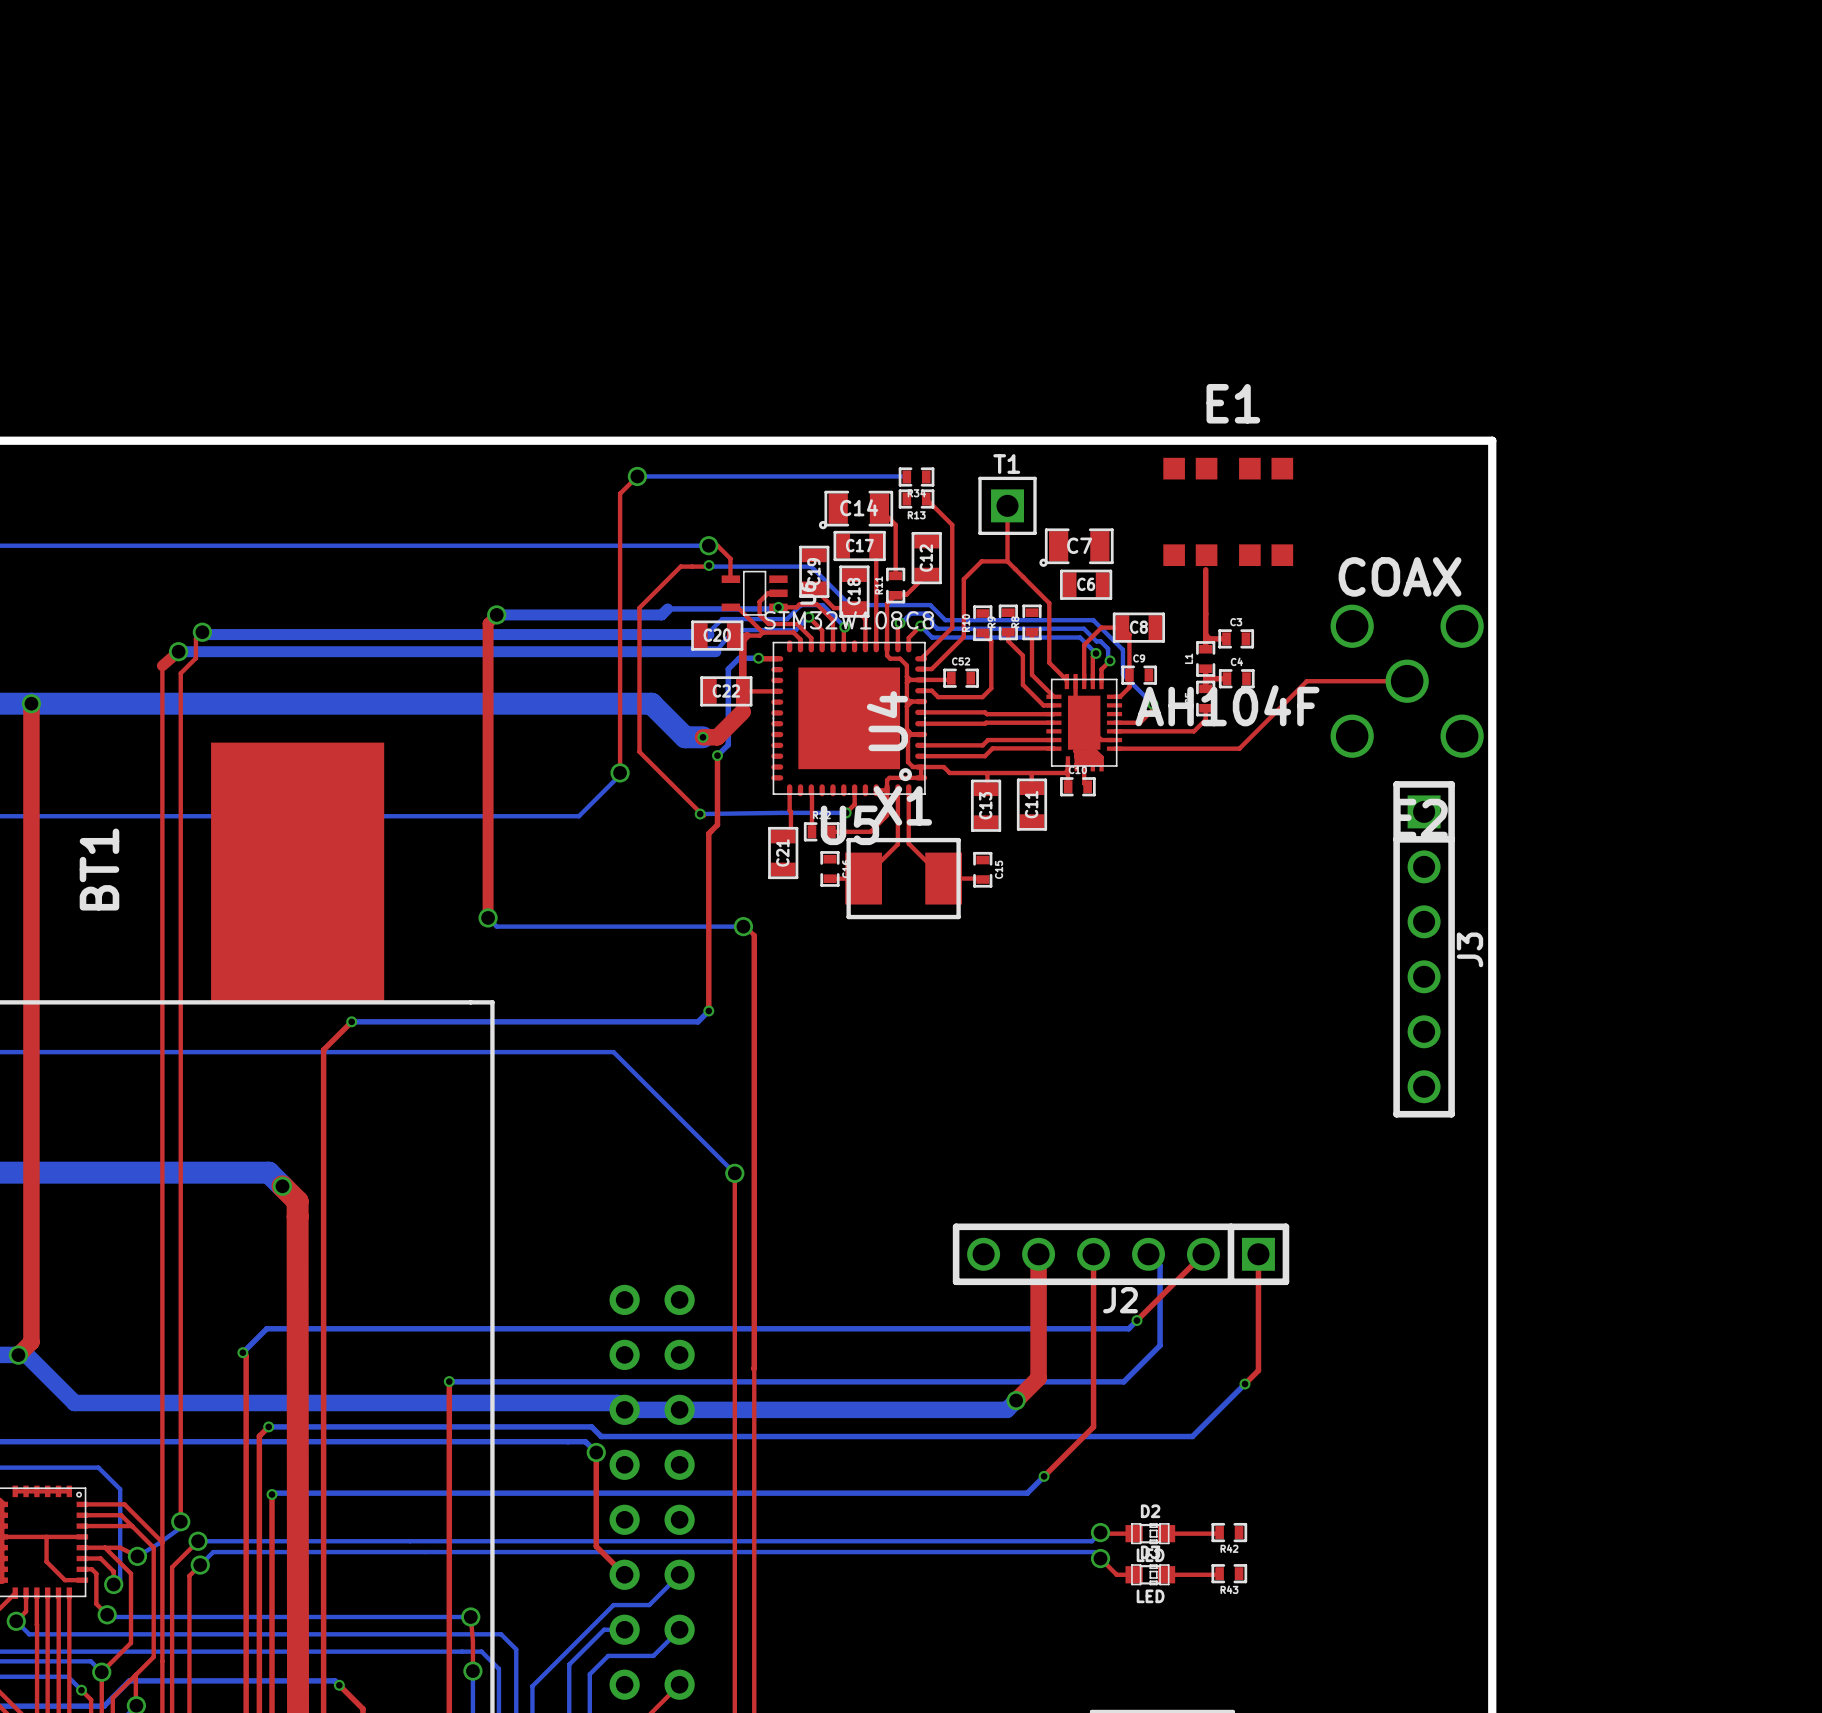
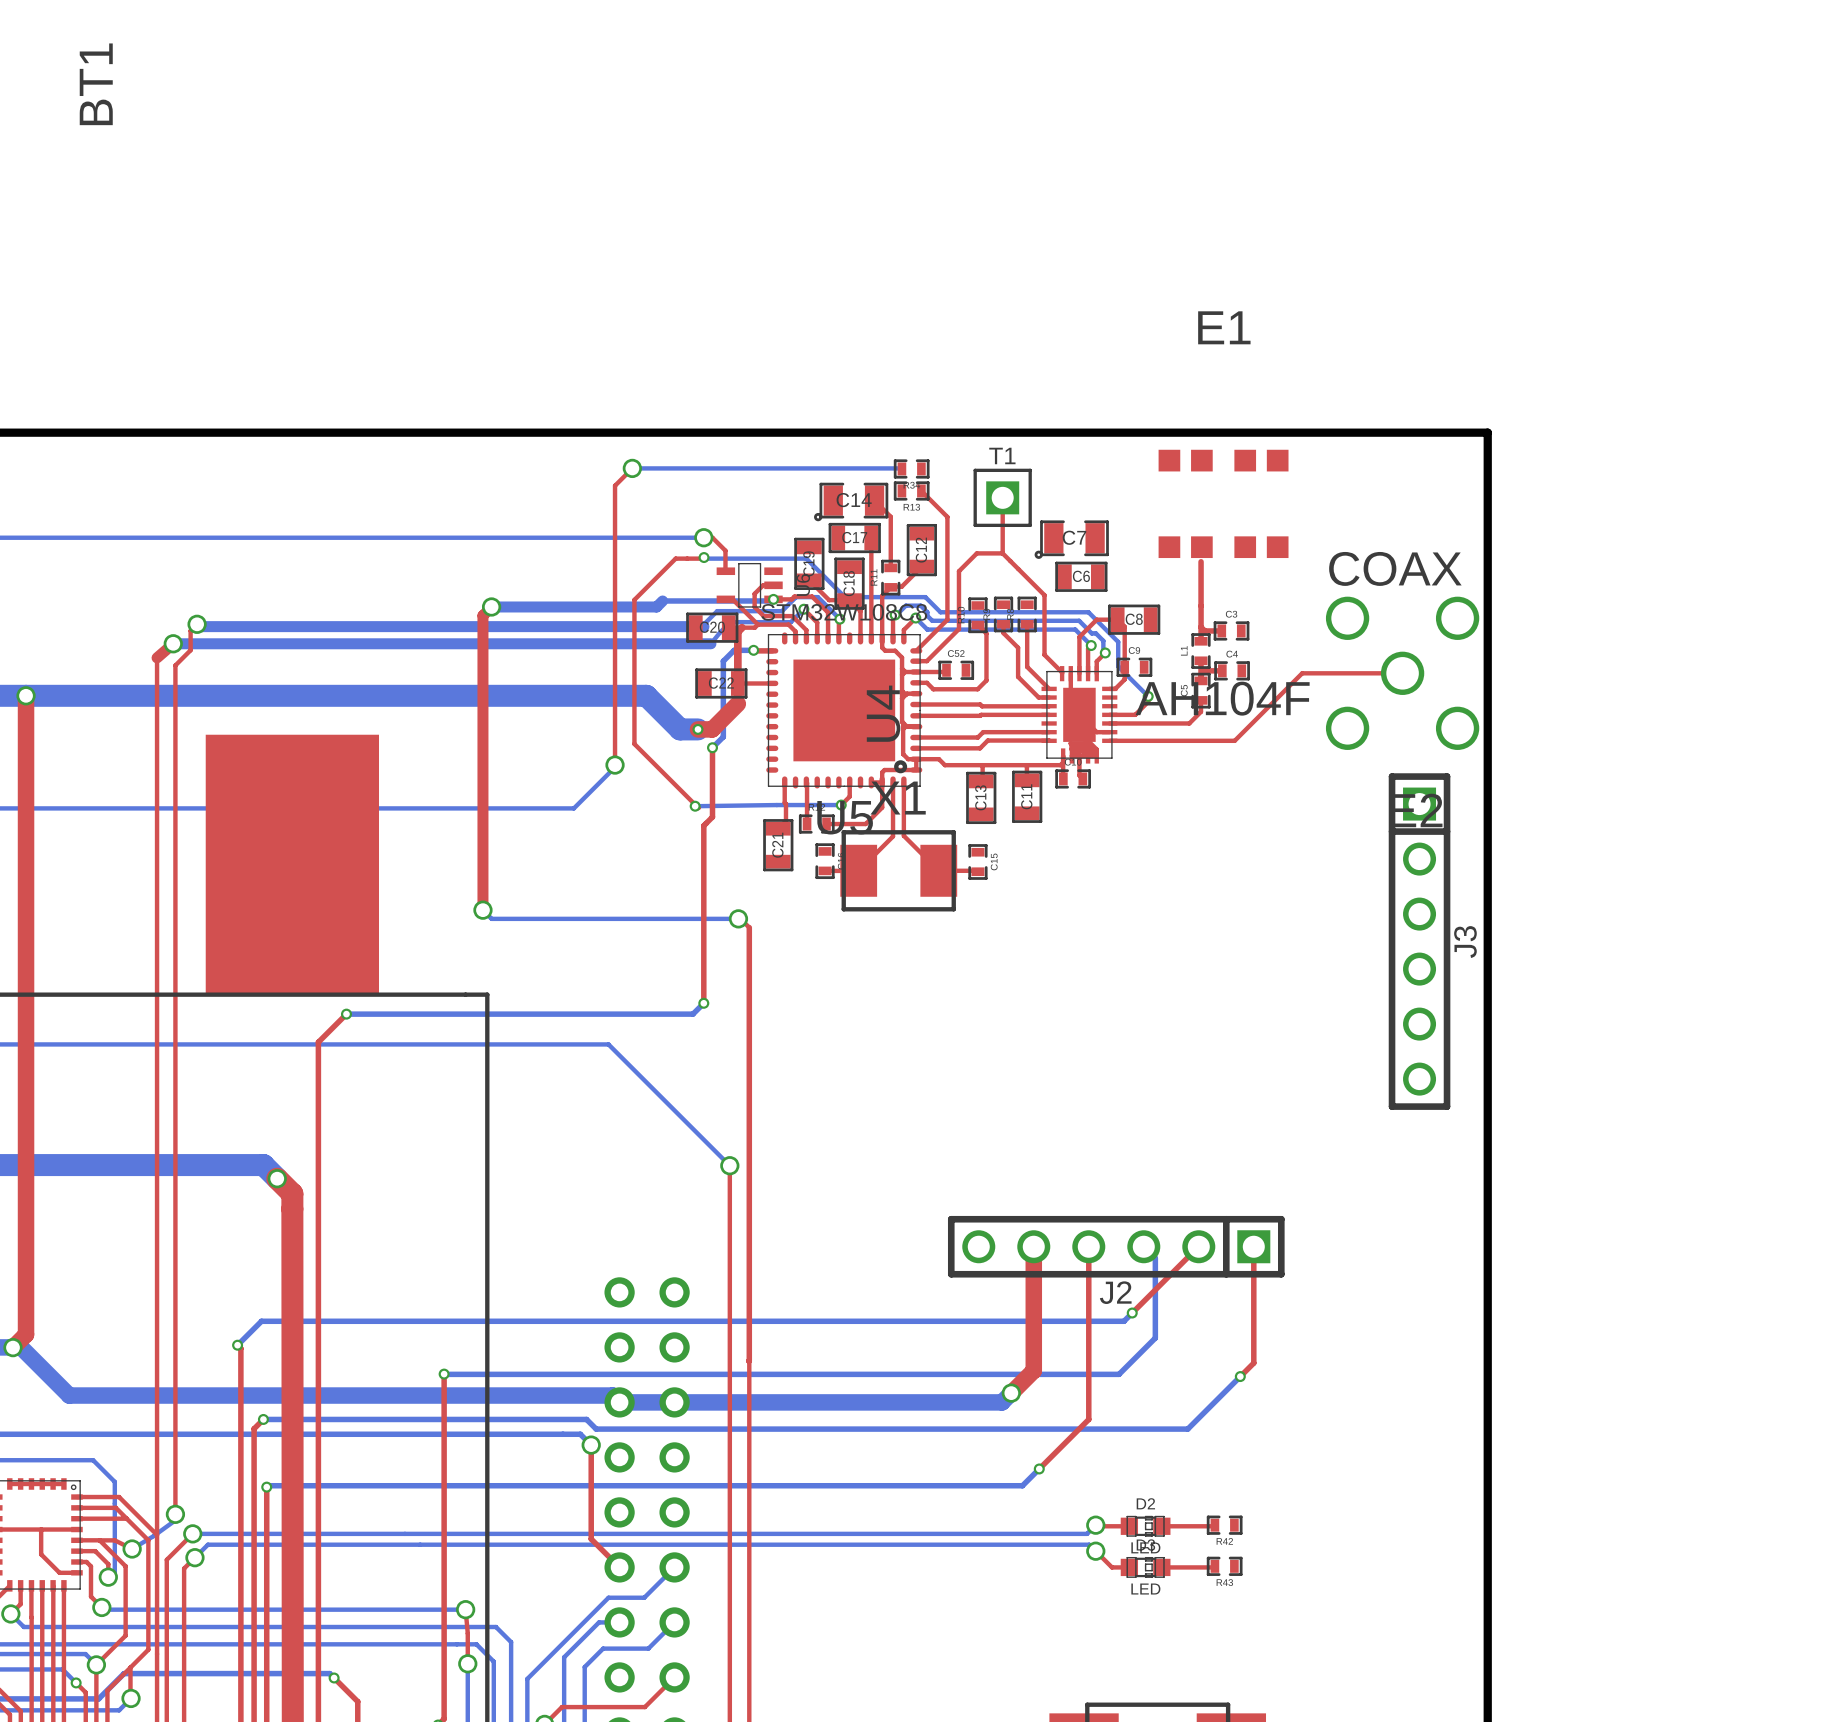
E1 name position: E1 (1233, 403) -> E1 (1224, 327)
BT1 name position: BT1 (99, 869) -> BT1 (96, 84)

